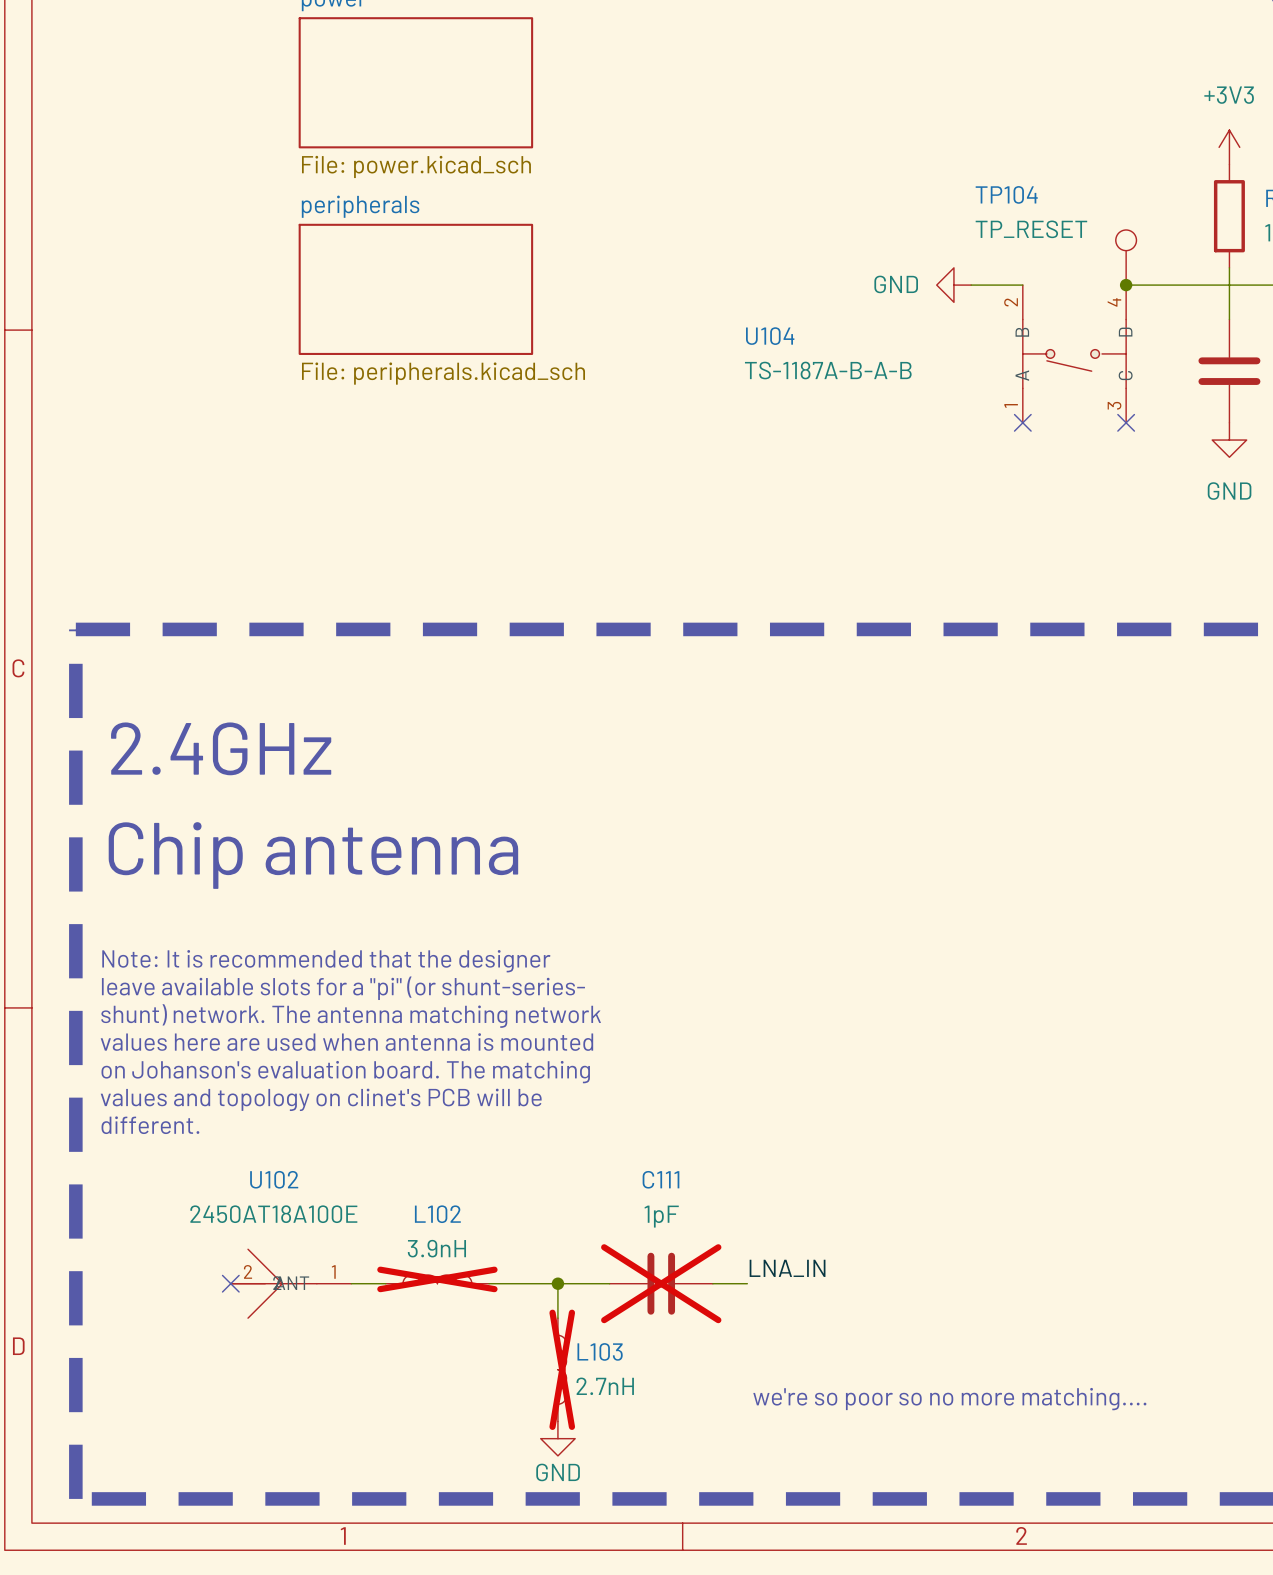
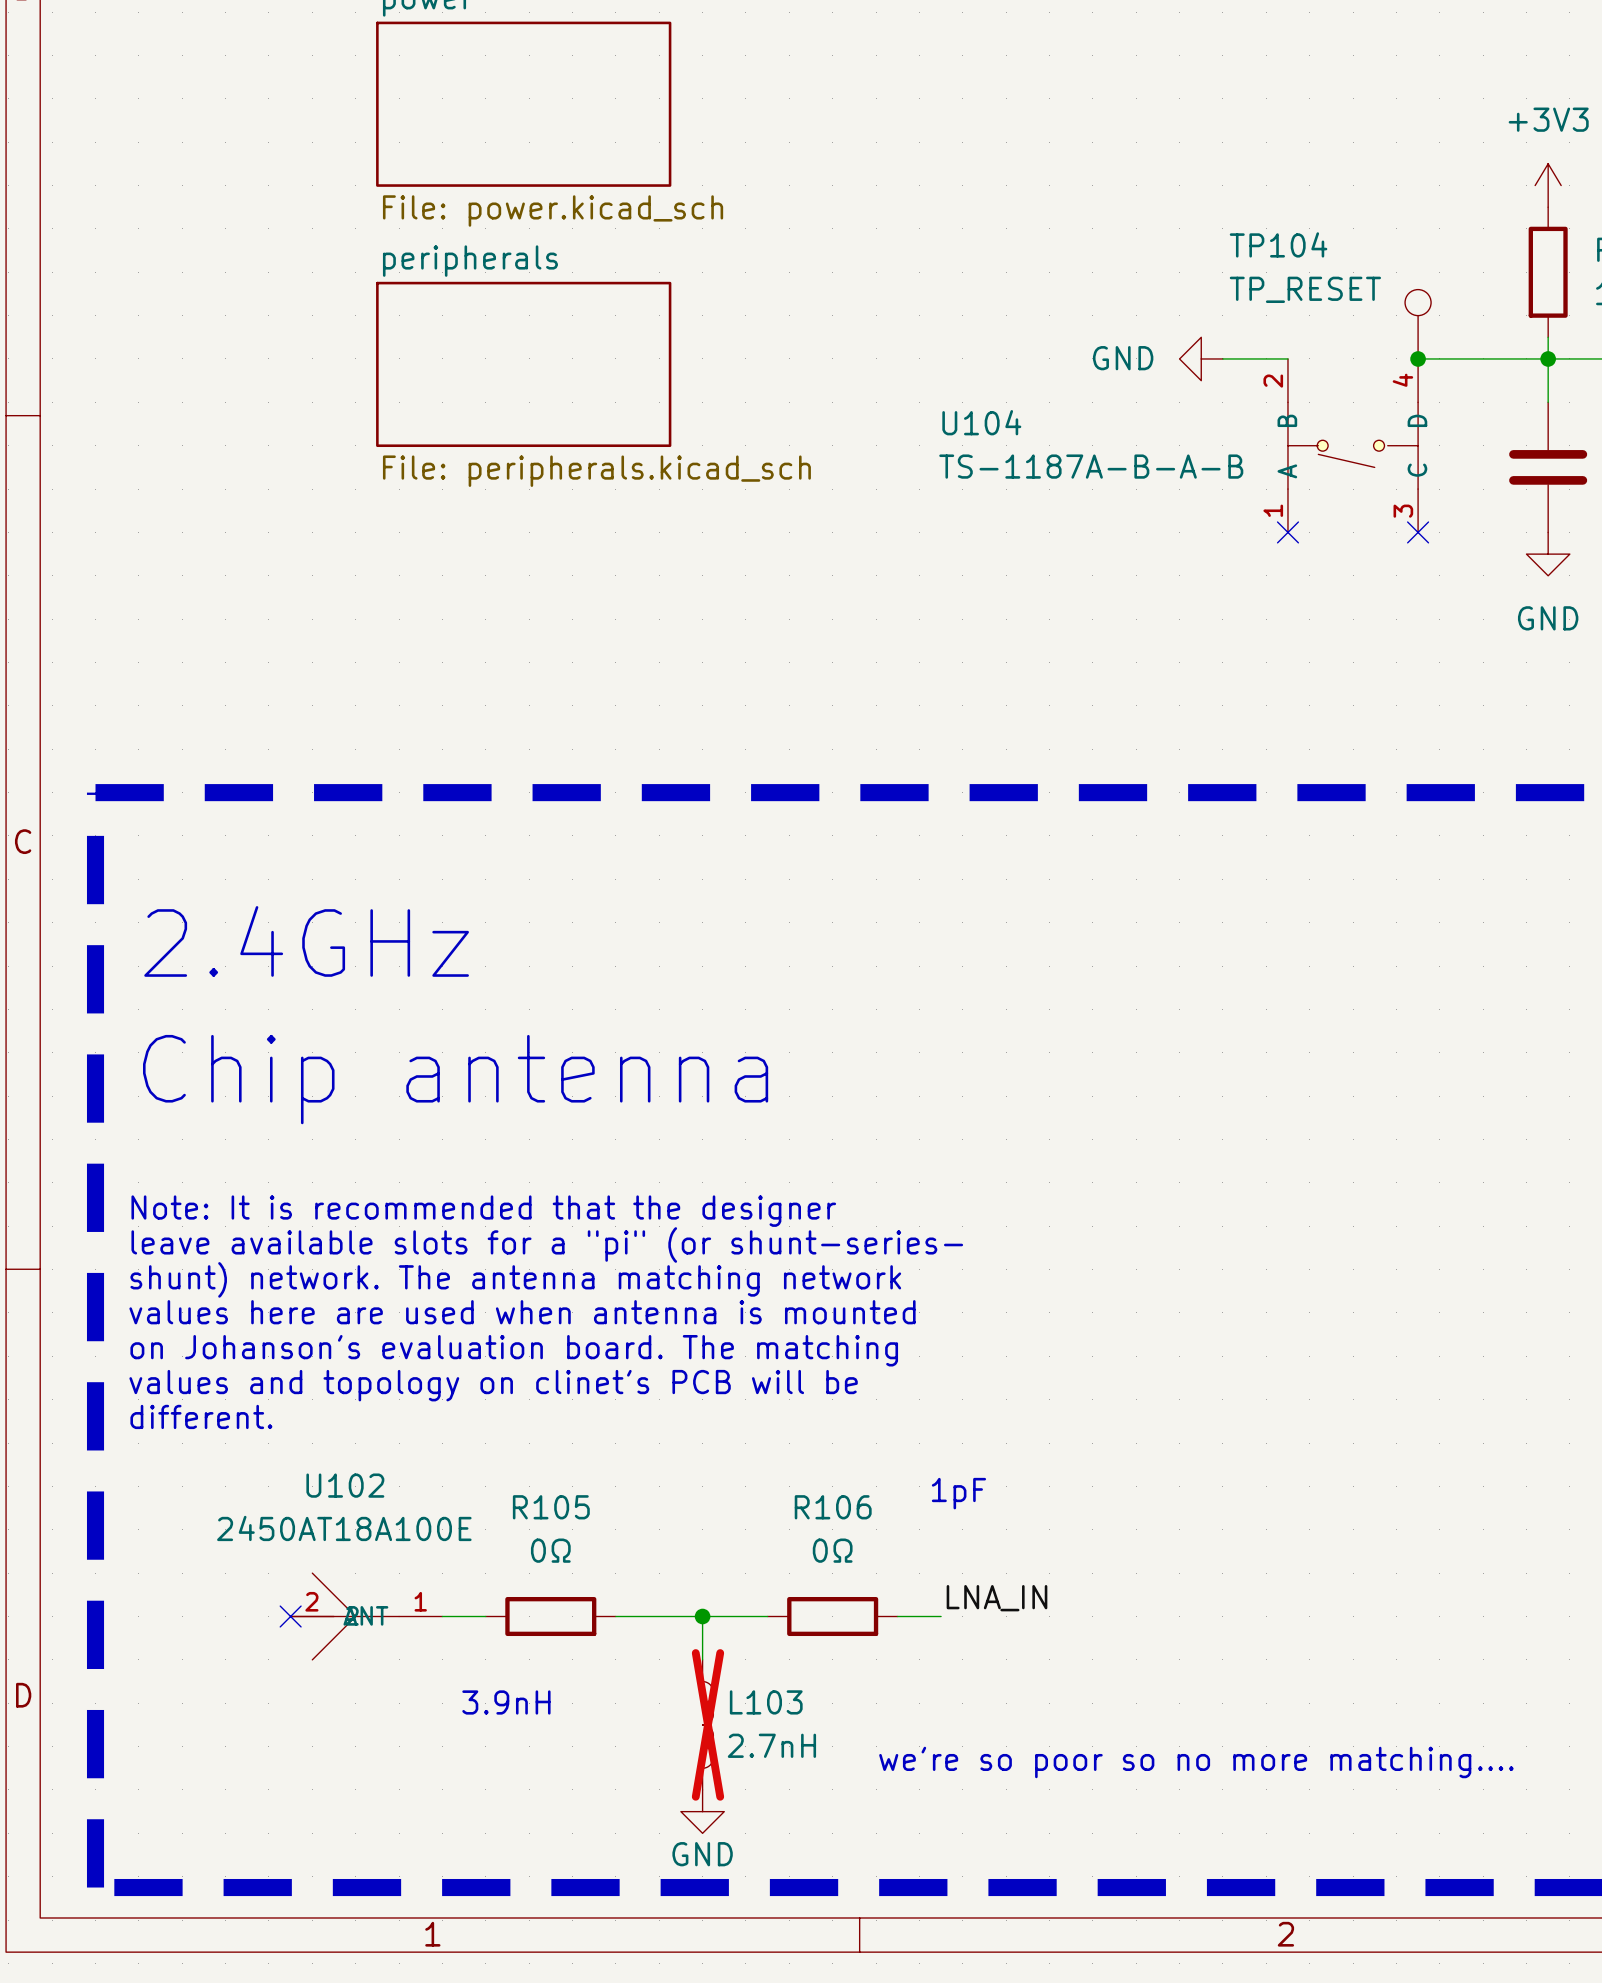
junction: none -> (1548, 358)
text: none -> 1pF (958, 1493)
L102: 3.9nH (437, 1279) -> none
R105: none -> 0Ω (550, 1616)
C111: 1pF (661, 1283) -> none
R106: none -> 0Ω (832, 1616)
text: none -> 3.9nH (506, 1702)

